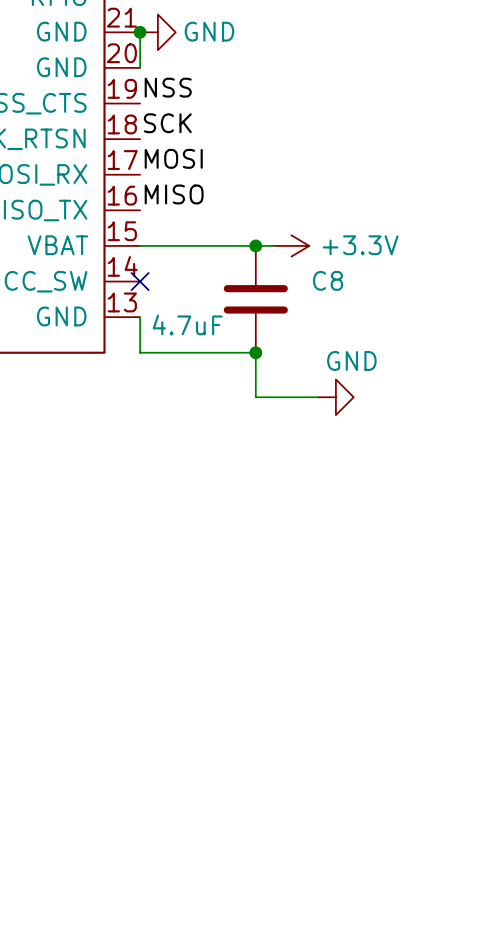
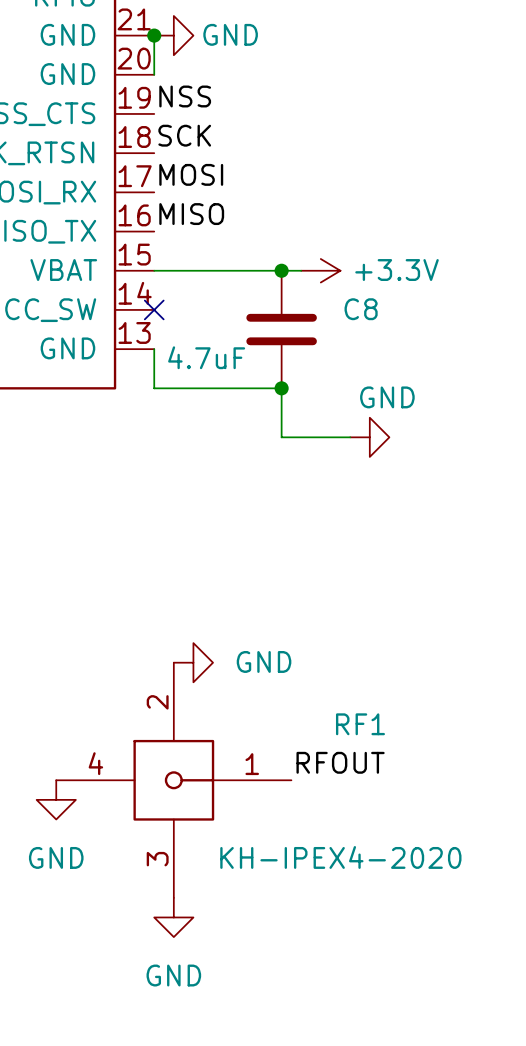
power symbol: none -> GND (193, 662)
label: none -> RFOUT (340, 762)
RF1: none -> KH-IPEX4-2020 (173, 780)
power symbol: none -> GND (56, 799)
power symbol: none -> GND (173, 917)

